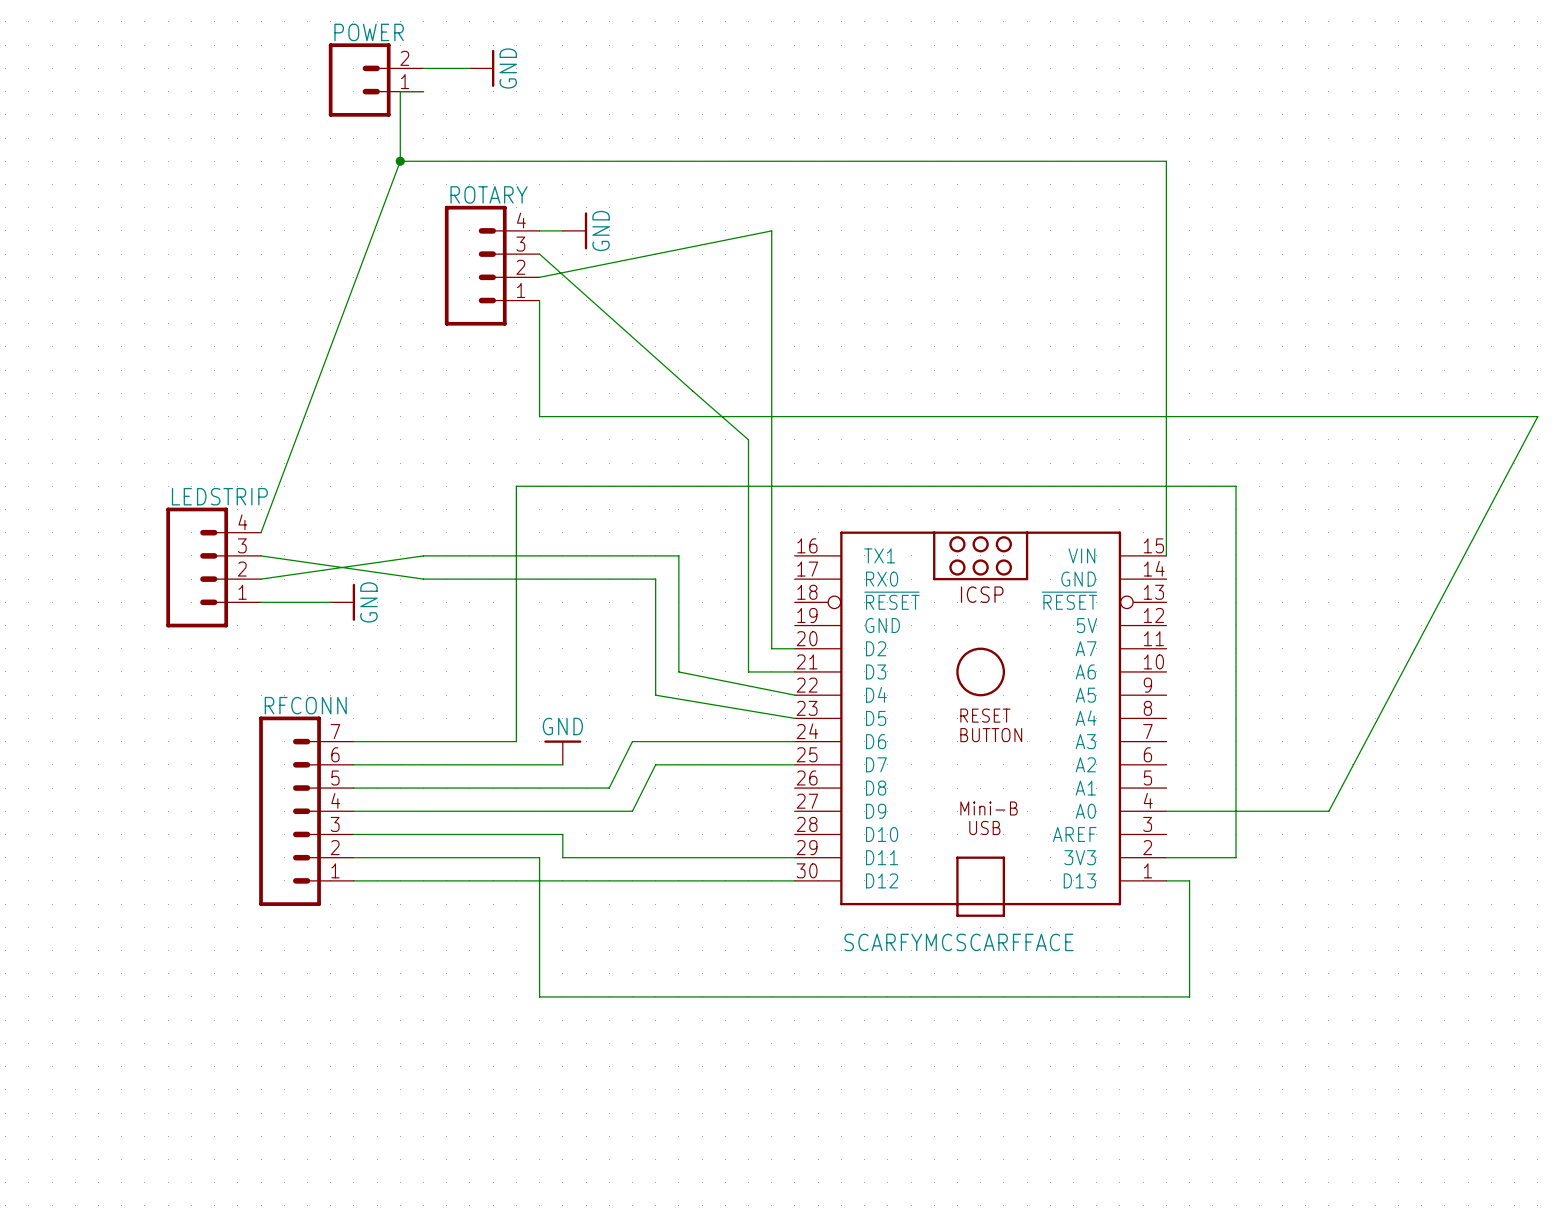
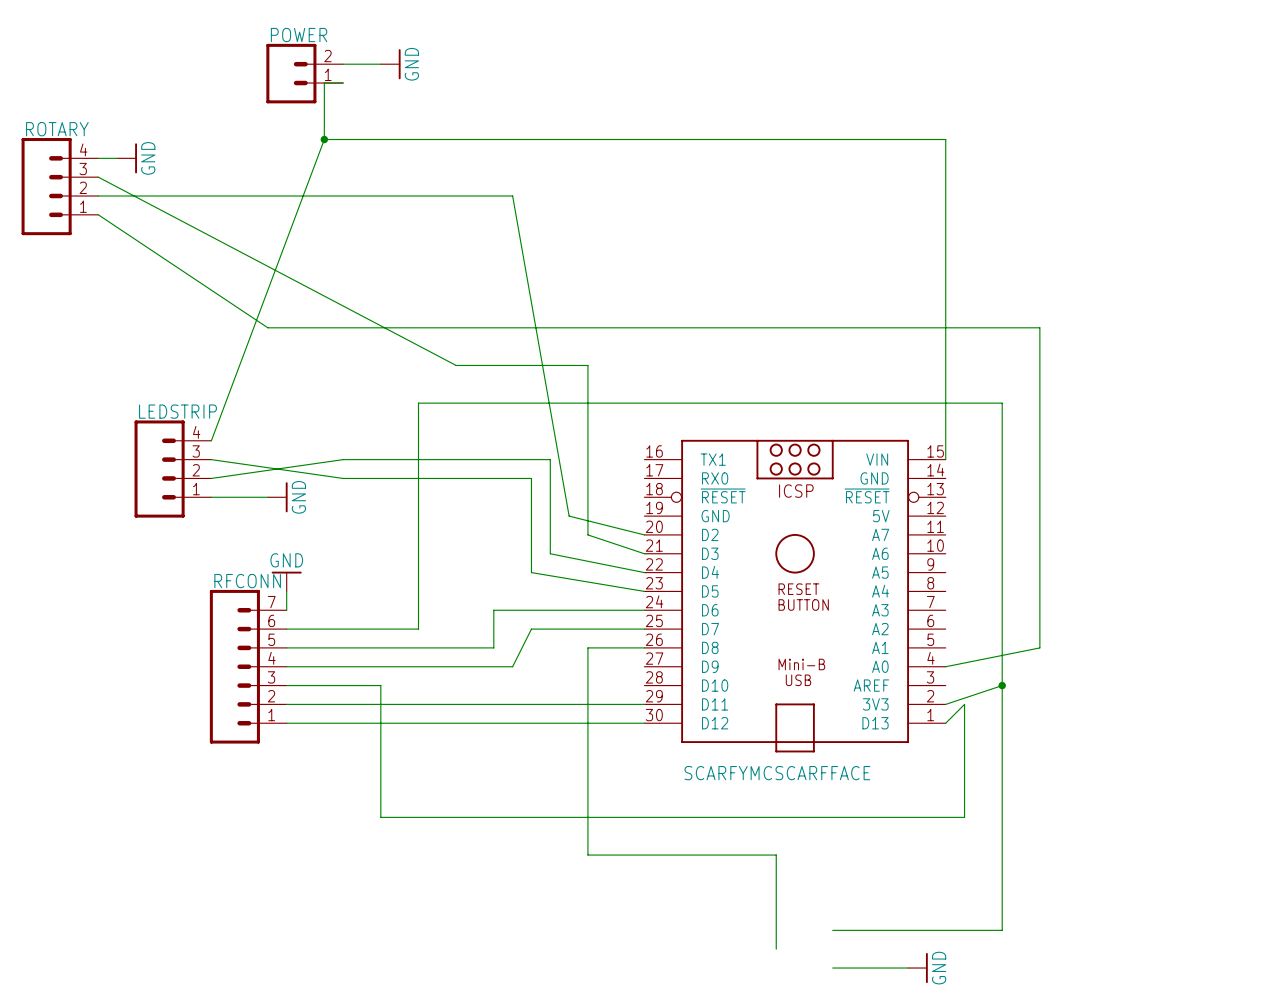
wire: none -> (98, 158) (117, 158)
power symbol: none -> GND (127, 158)
ROTARY: none -> (59, 186)
wire: none -> (98, 196) (437, 196)
power symbol: GND (574, 230) -> none
wire: (539, 254) (748, 439) (748, 671) (794, 671) -> (98, 177) (456, 365) (587, 365) (587, 534) (644, 553)
ROTARY: (492, 265) -> none
wire: (539, 277) (771, 230) (771, 648) (794, 648) -> (456, 196) (512, 196) (569, 516) (644, 534)
wire: (539, 300) (539, 416) (1537, 416) (1328, 811) (1166, 811) -> (98, 214) (267, 327) (1039, 327) (1039, 647) (945, 666)
wire: (353, 741) (516, 741) -> (286, 610) (286, 591)
wire: (632, 741) (609, 788) -> (512, 610) (493, 610) (493, 647)
power symbol position: GND (562, 752) -> GND (286, 581)
wire: (516, 764) (562, 764) -> (418, 629) (418, 610)
wire: none -> (644, 647) (587, 647) (587, 855) (776, 855) (776, 949)
wire: (469, 834) (562, 834) (562, 857) -> (437, 704) (456, 704)
junction: none -> (1002, 685)
wire: (539, 857) (539, 996) -> (380, 685) (380, 817) (437, 817)
wire: (1166, 857) (1236, 857) -> (945, 704) (1002, 685)
wire: none -> (1002, 704) (1002, 930) (832, 930)
wire: (1166, 880) (1189, 880) -> (945, 723) (964, 704) (964, 723)
wire: none -> (832, 968) (908, 968)
power symbol: none -> GND (917, 968)

